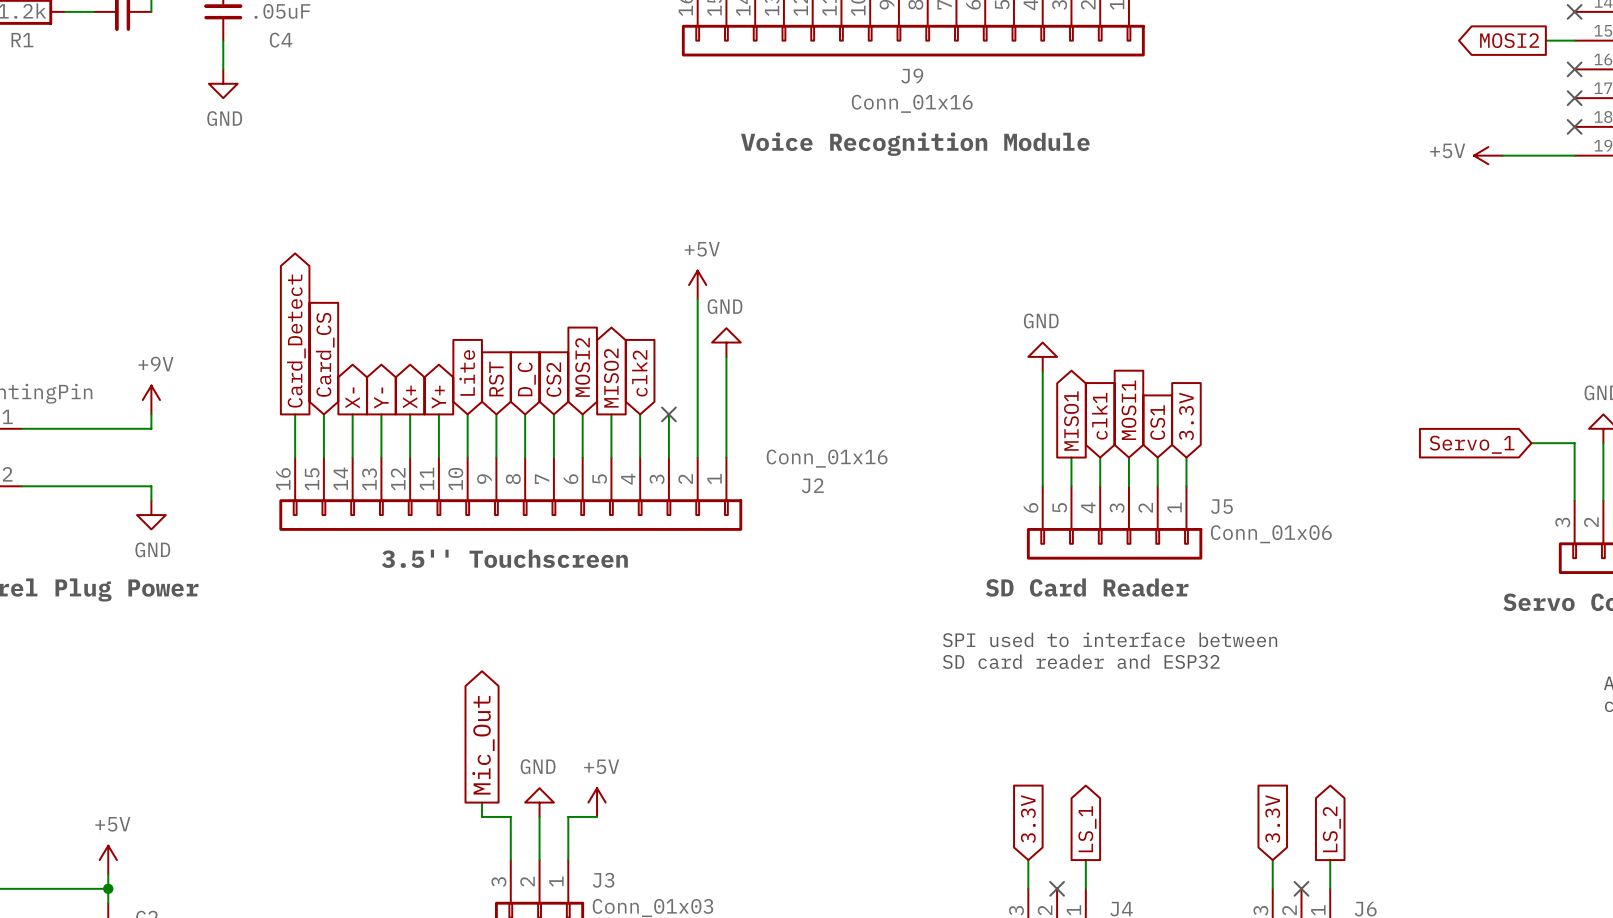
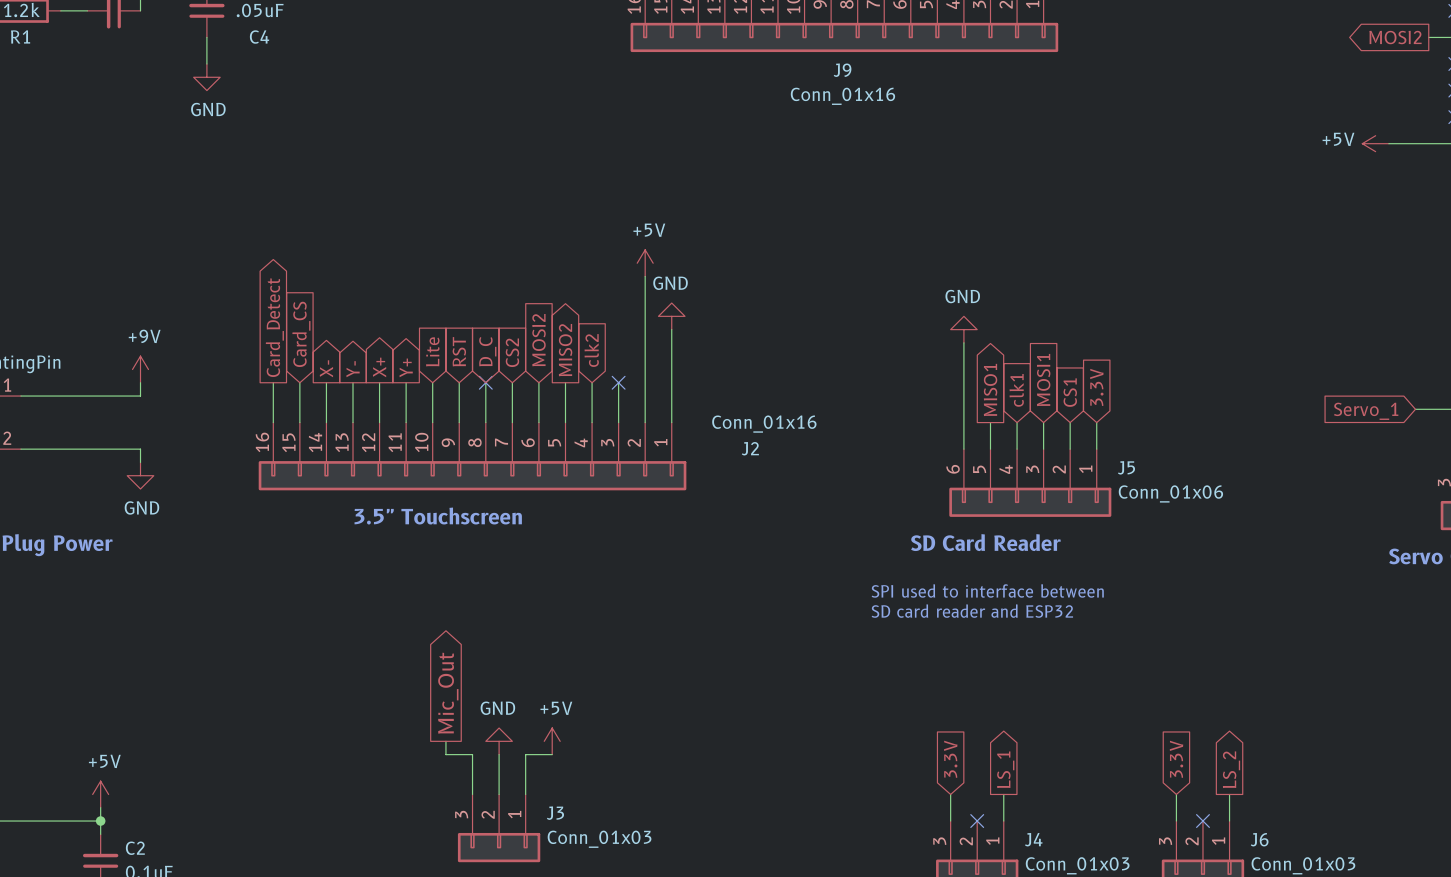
text: Voice Recognition Module (915, 144) -> none
no-connect mark: none -> (485, 382)

